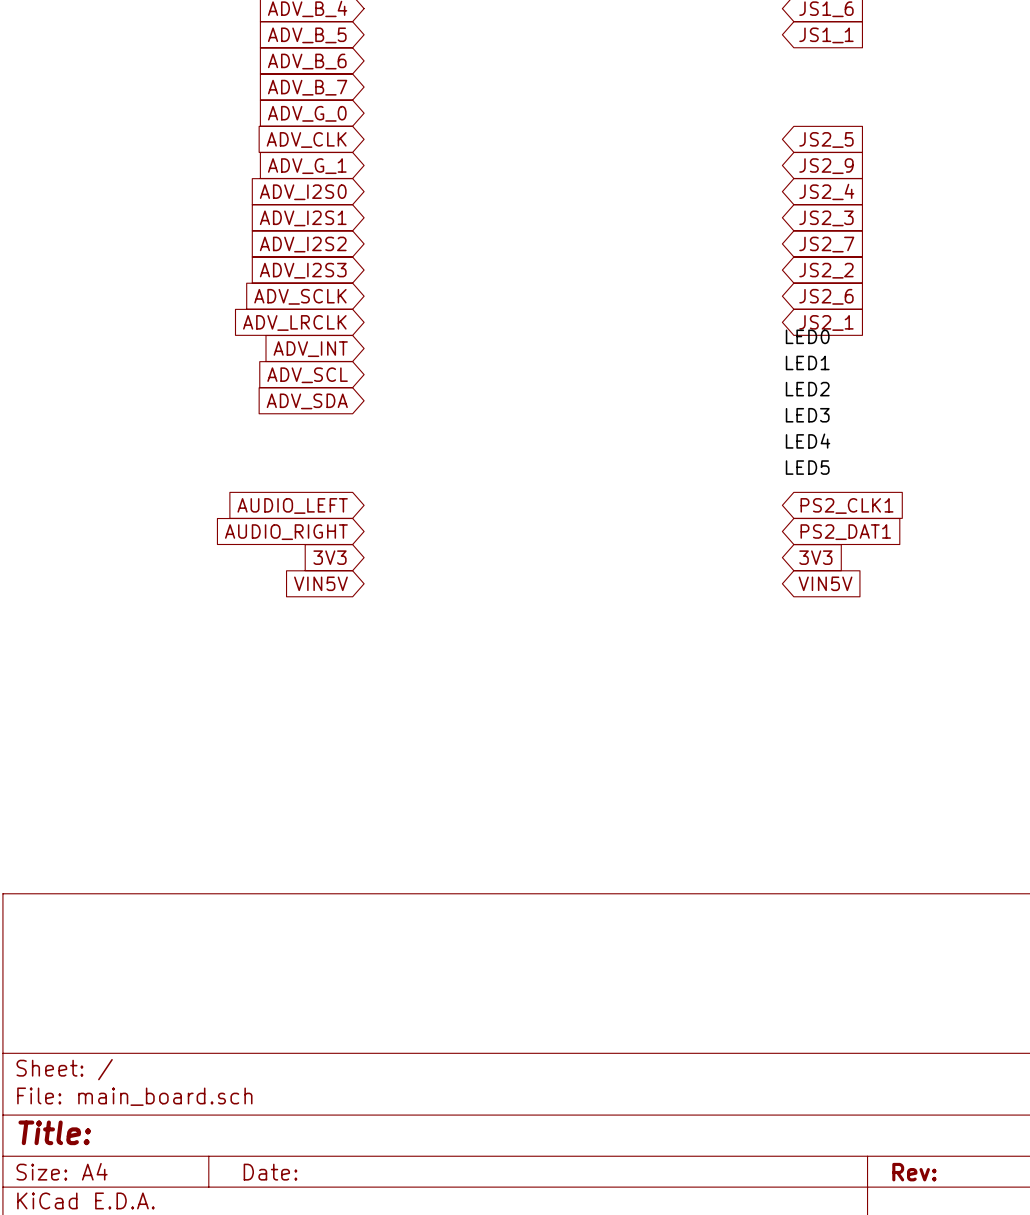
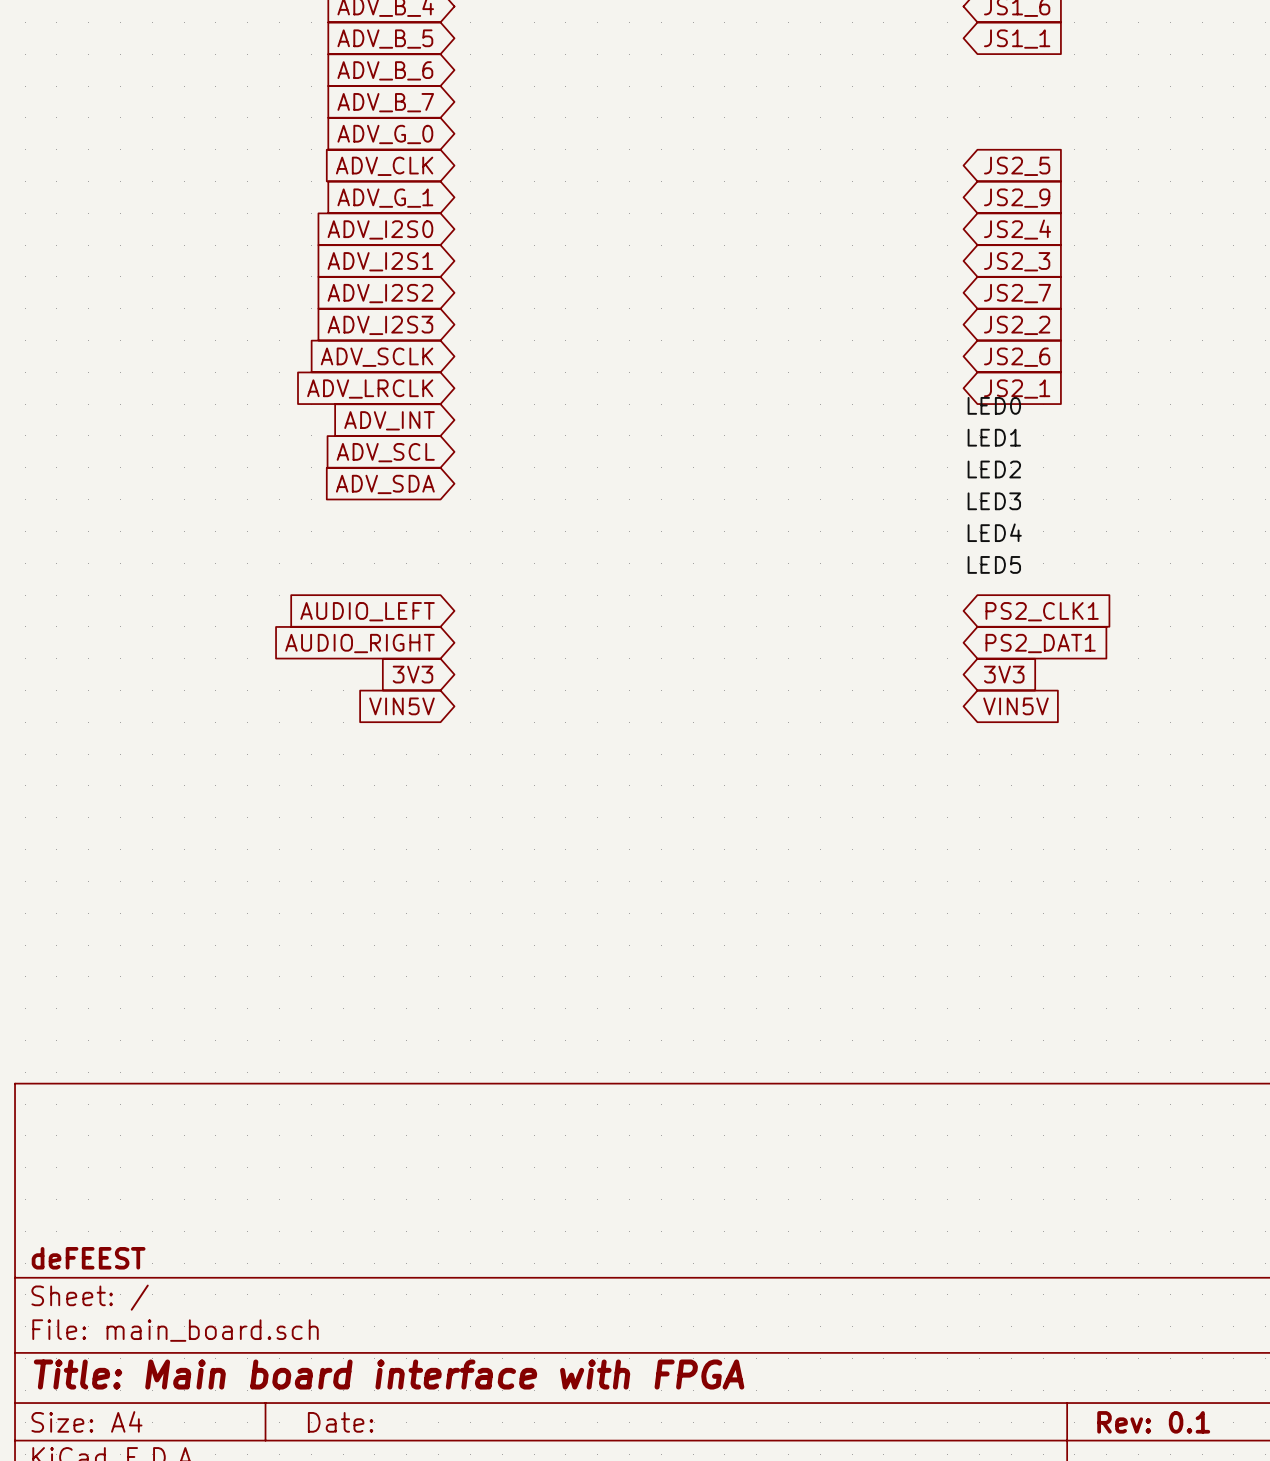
title block: none -> deFEEST (88, 1258)
title block: Title: (54, 1132) -> Title: Main board interface with FPGA (389, 1374)
title block: Rev: (914, 1172) -> Rev: 0.1 (1153, 1422)

